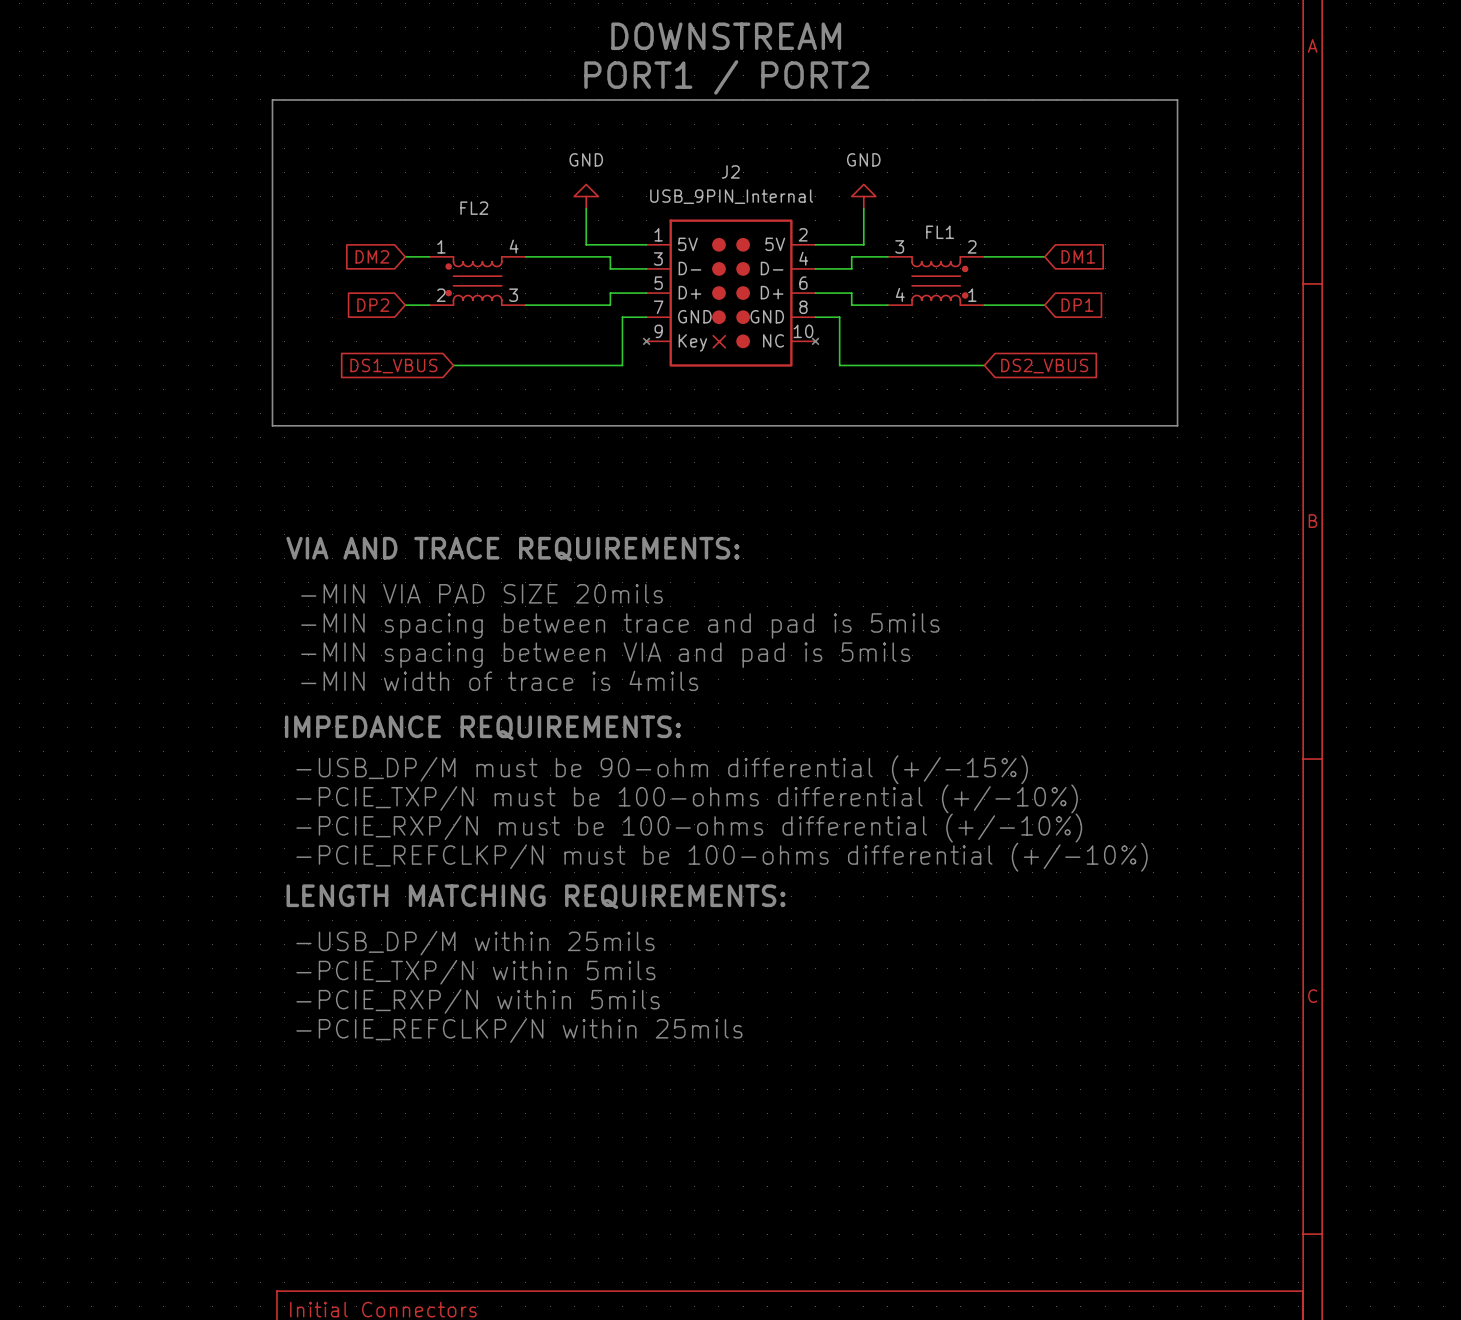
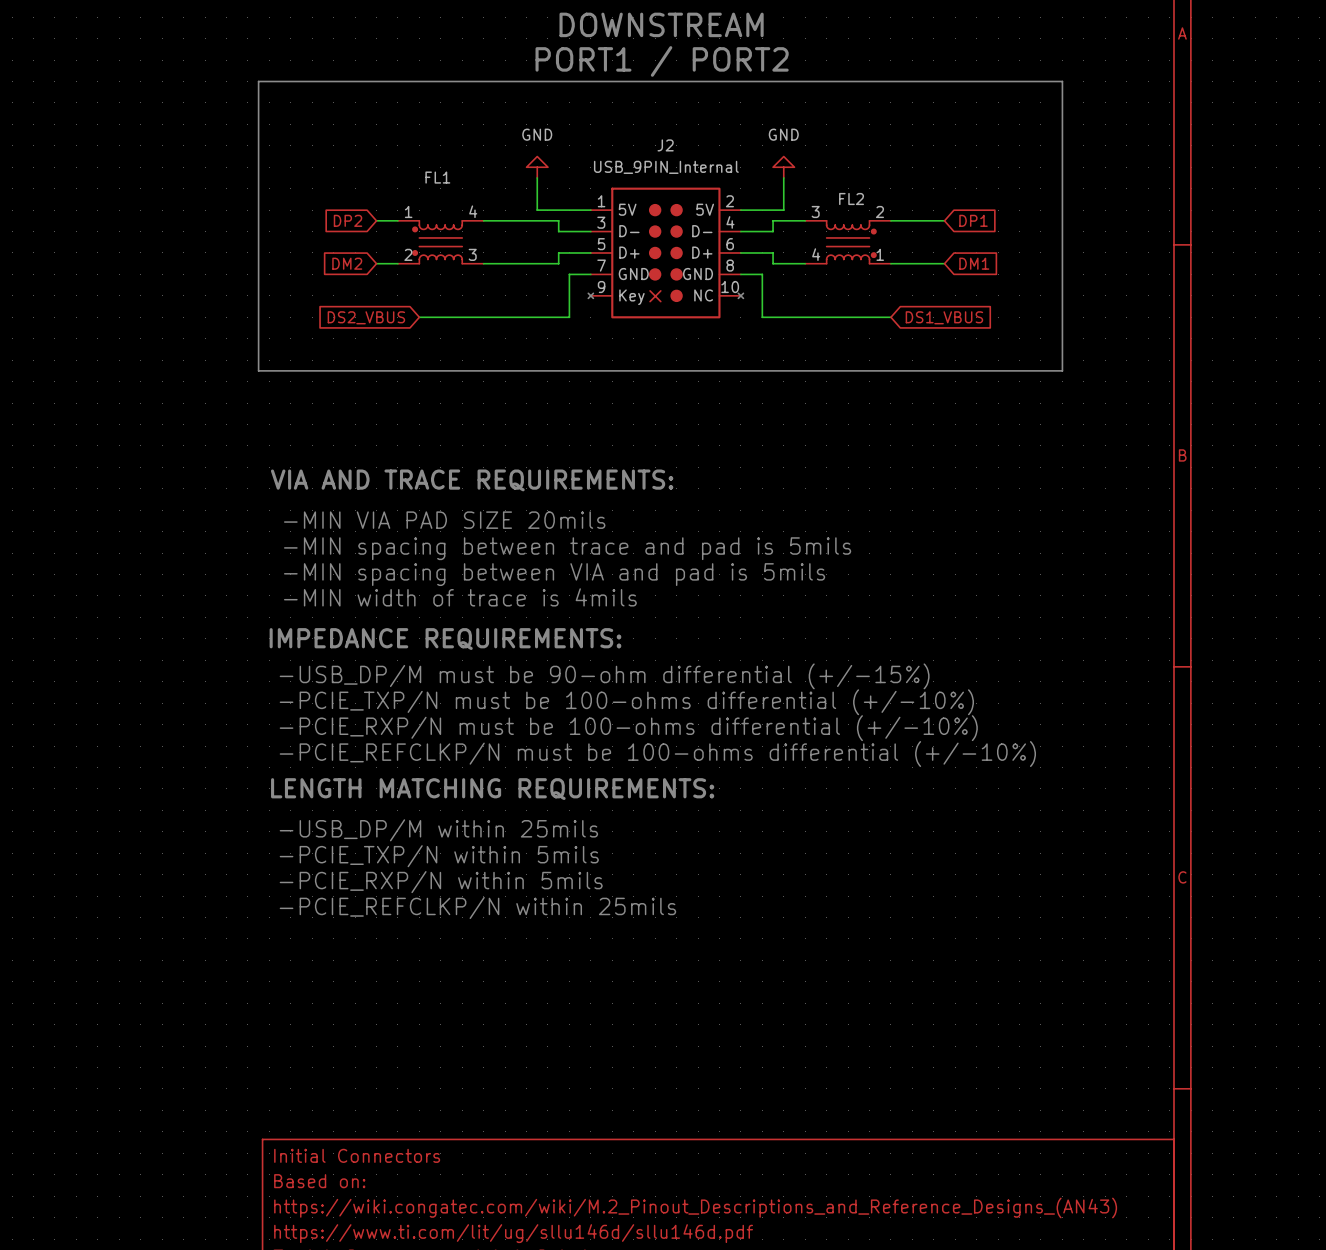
FL2 name: FL2 (474, 208) -> FL1 (437, 177)
FL1 name: FL1 (940, 232) -> FL2 (851, 199)
global label: DM2 (372, 256) -> DP2 (348, 220)
global label: DM1 (1078, 256) -> DP1 (973, 220)
global label: DP2 (373, 305) -> DM2 (347, 263)
global label: DP1 (1077, 305) -> DM1 (974, 263)
global label: DS1_VBUS (393, 366) -> DS2_VBUS (366, 317)
global label: DS2_VBUS (1044, 366) -> DS1_VBUS (944, 317)

